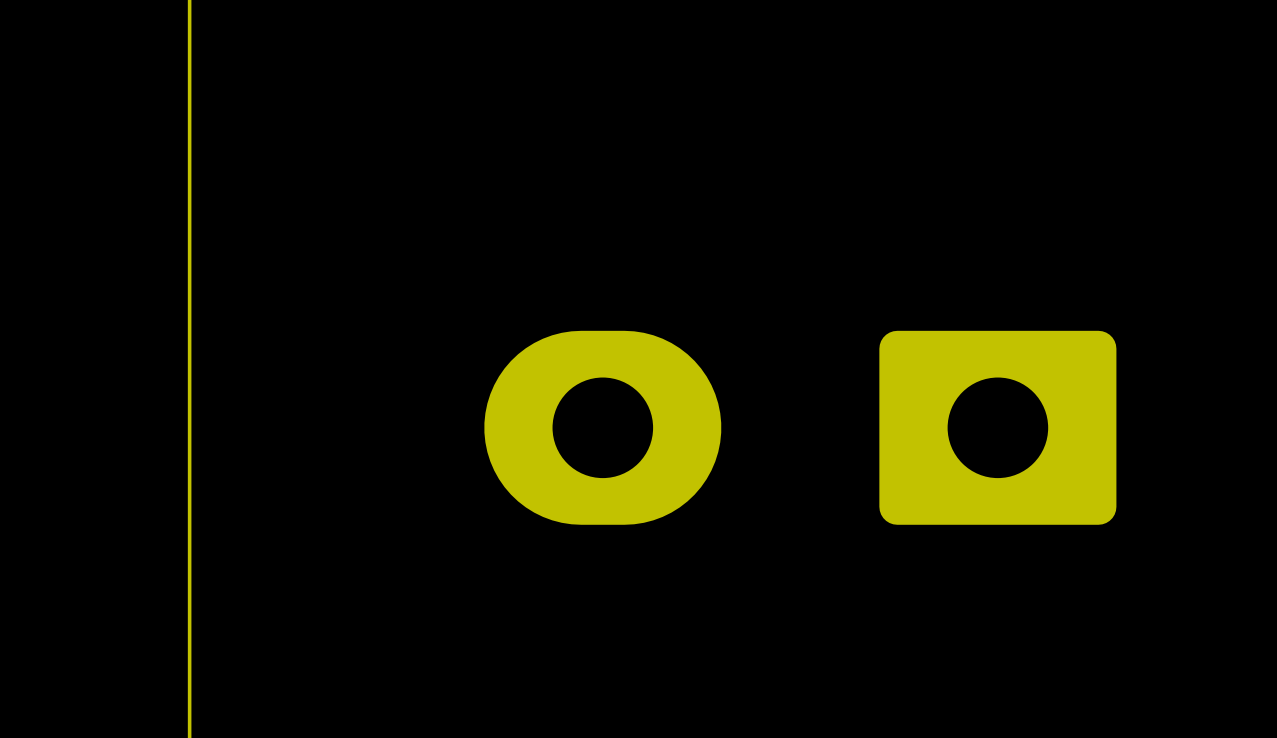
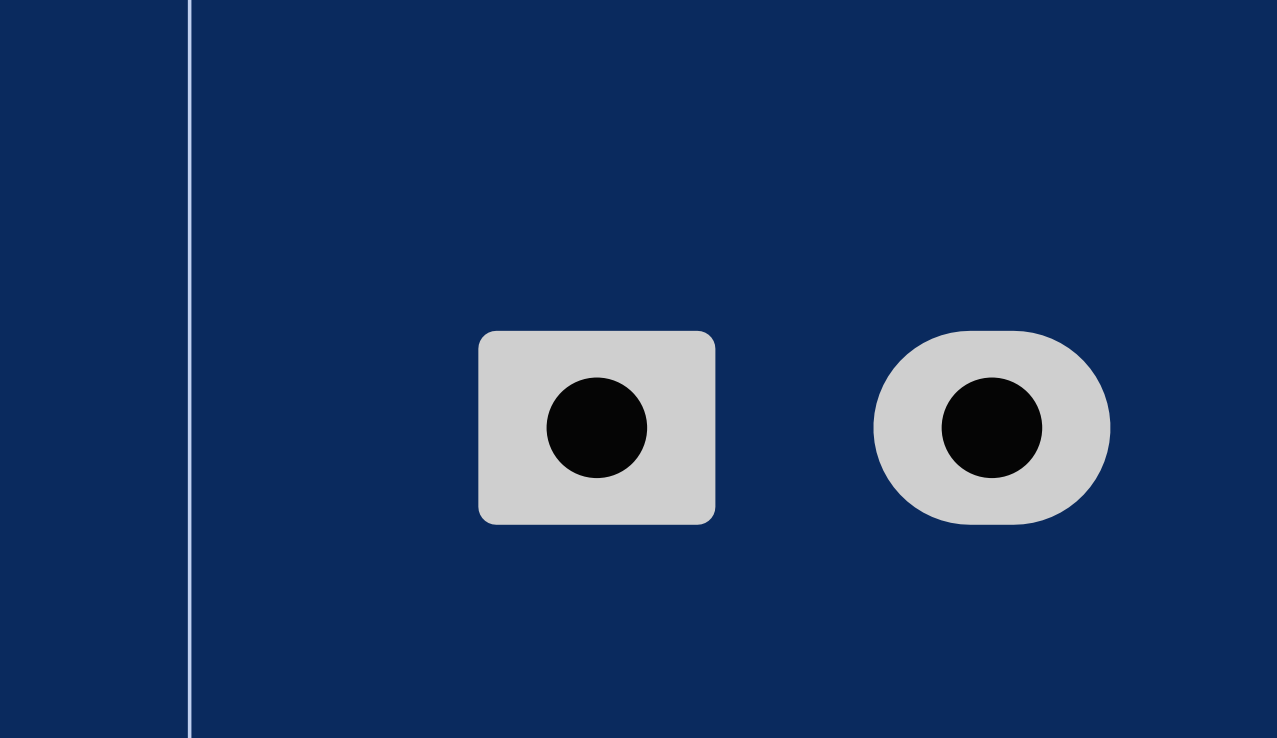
part rotation: 0° (800, 427) -> 180° (794, 427)

